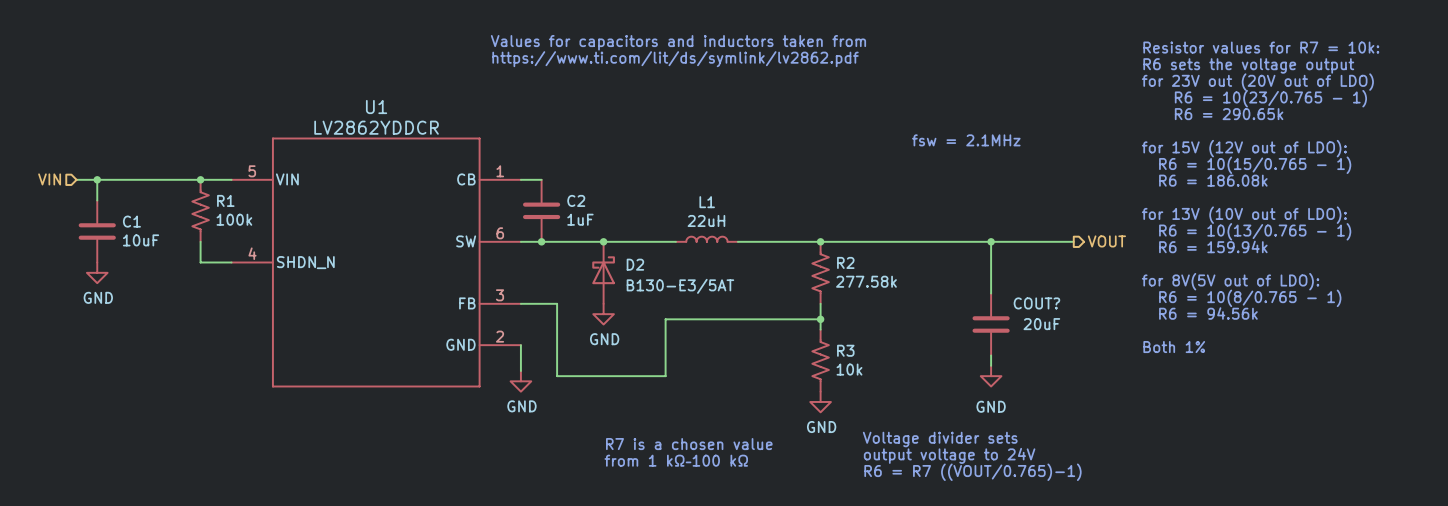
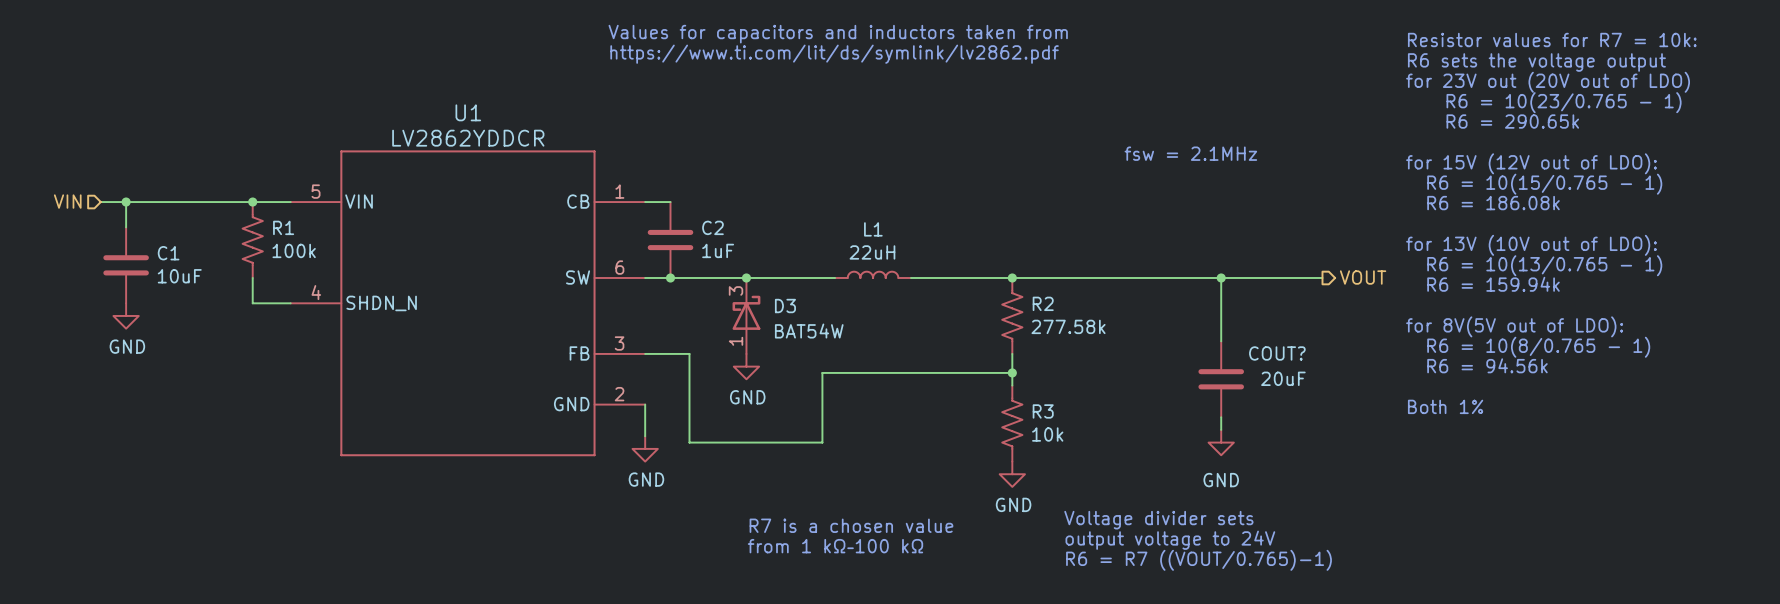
D2 pin number: none -> 3 (736, 290)
D2 name: D2 (635, 264) -> D3 (785, 306)
D2 value: B130-E3/5AT (680, 286) -> BAT54W (809, 331)
D2 pin number: none -> 1 (736, 341)

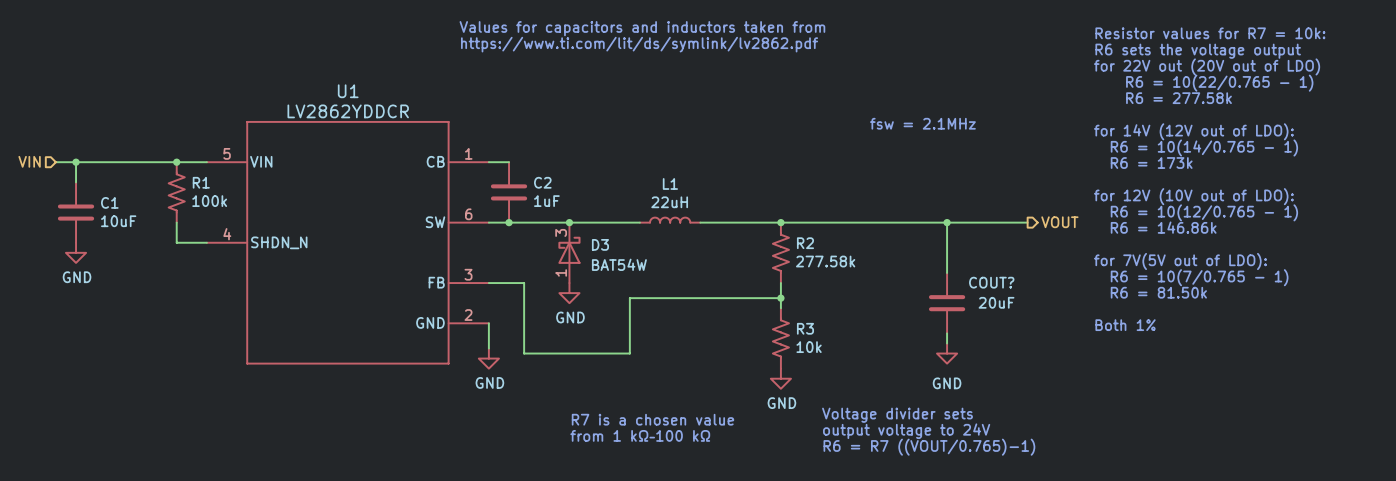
text: for 23V out (20V out of LDO) (1548, 82) -> for 22V out (20V out of LDO) (1207, 66)
text: R6 = 10(23/0.765 - 1) (1564, 102) -> R6 = 10(22/0.765 - 1) (1219, 83)
text: R6 = 290.65k (1512, 121) -> R6 = 277.58k (1178, 98)
text: for 15V (12V out of LDO): (1531, 163) -> for 14V (12V out of LDO): (1193, 131)
text: R6 = 10(15/0.765 - 1) (1544, 184) -> R6 = 10(14/0.765 - 1) (1204, 148)
text: R6 = 186.08k (1493, 203) -> R6 = 173k (1151, 163)
text: for 13V (10V out of LDO): (1531, 245) -> for 12V (10V out of LDO): (1193, 196)
text: R6 = 10(13/0.765 - 1) (1544, 265) -> R6 = 10(12/0.765 - 1) (1204, 212)
text: R6 = 159.94k (1493, 284) -> R6 = 146.86k (1163, 227)
text: for 8V(5V out of LDO): (1514, 326) -> for 7V(5V out of LDO): (1180, 261)
text: R6 = 10(8/0.765 - 1) (1538, 347) -> R6 = 10(7/0.765 - 1) (1199, 277)
text: R6 = 94.56k (1487, 365) -> R6 = 81.50k (1158, 292)

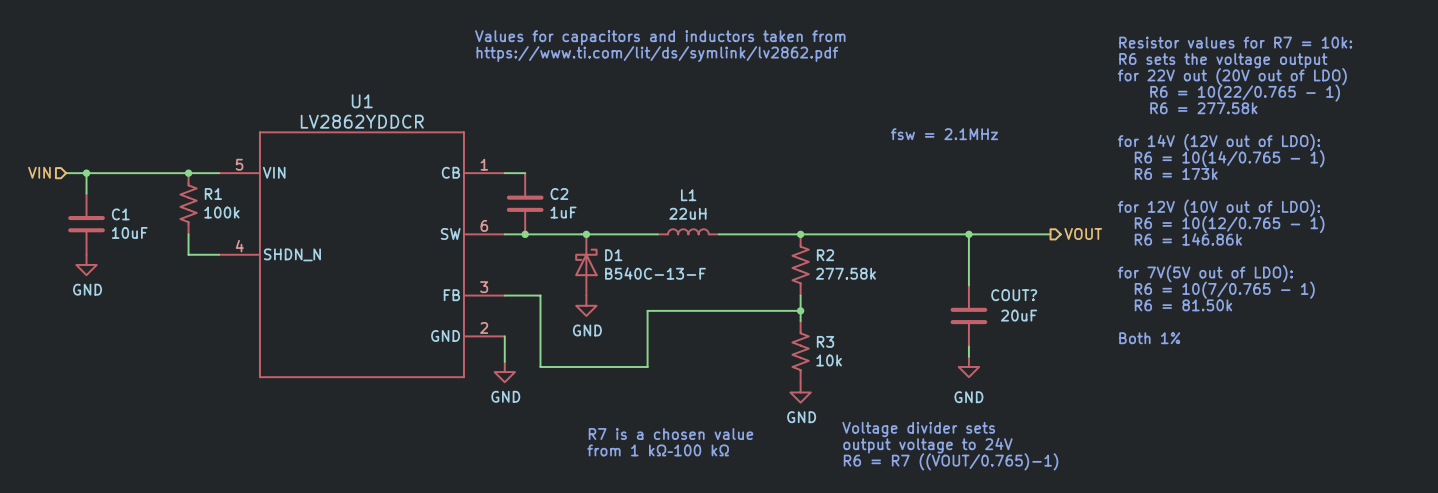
D3 pin number: 3 (561, 232) -> none
D3 name: D3 (600, 244) -> D1 (613, 255)
D3 value: BAT54W (619, 264) -> B540C-13-F (655, 273)
D3 pin number: 1 (561, 272) -> none

